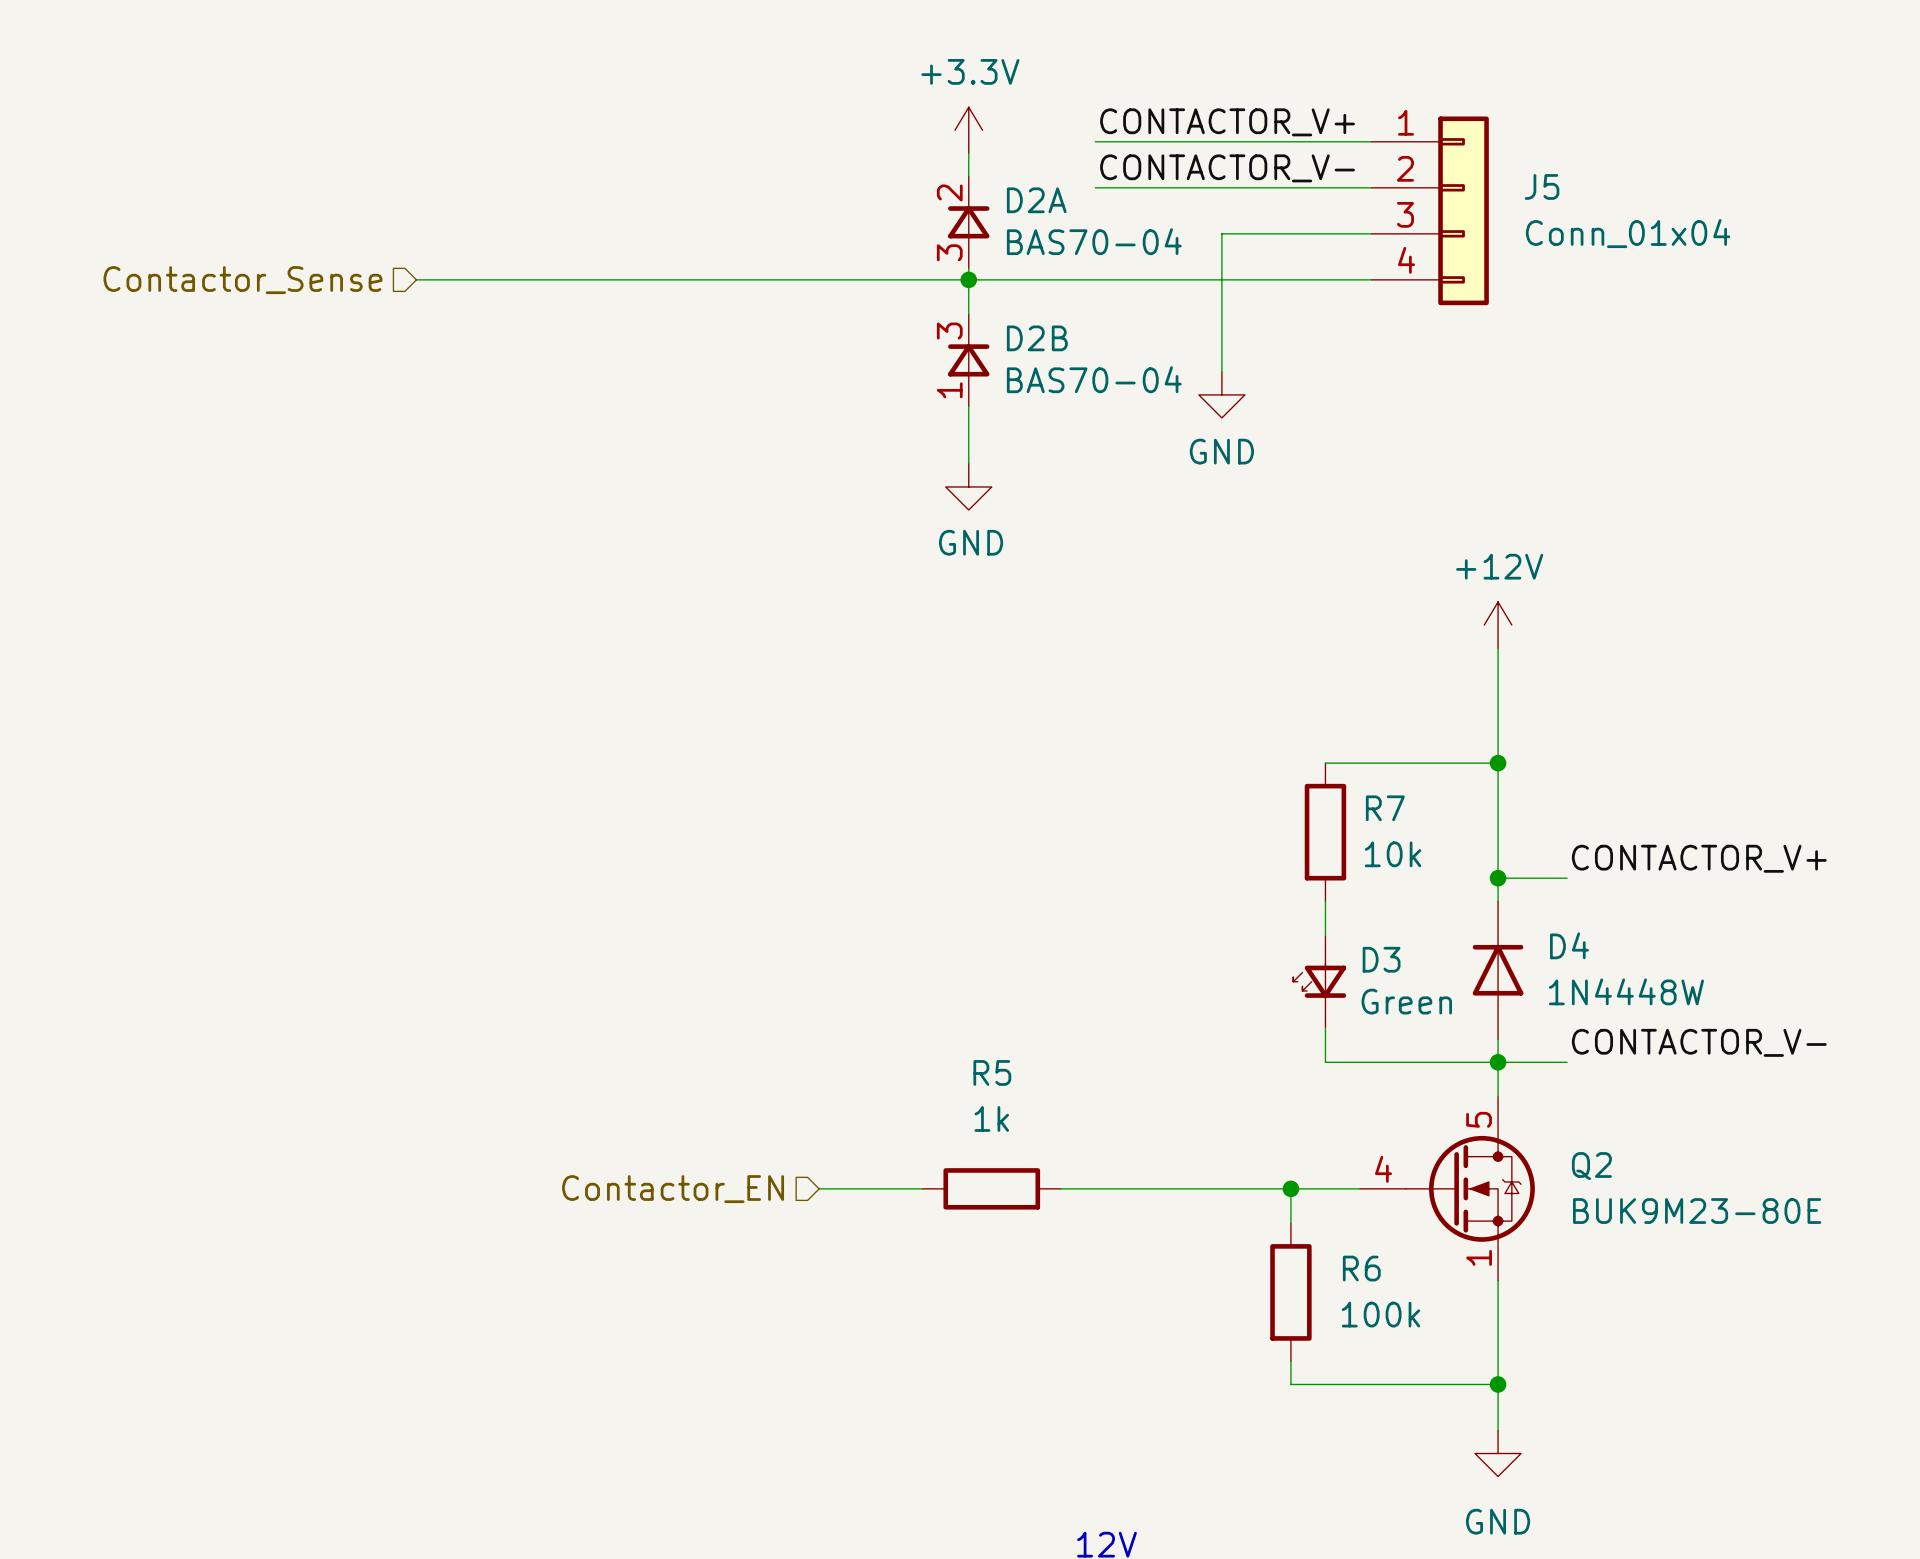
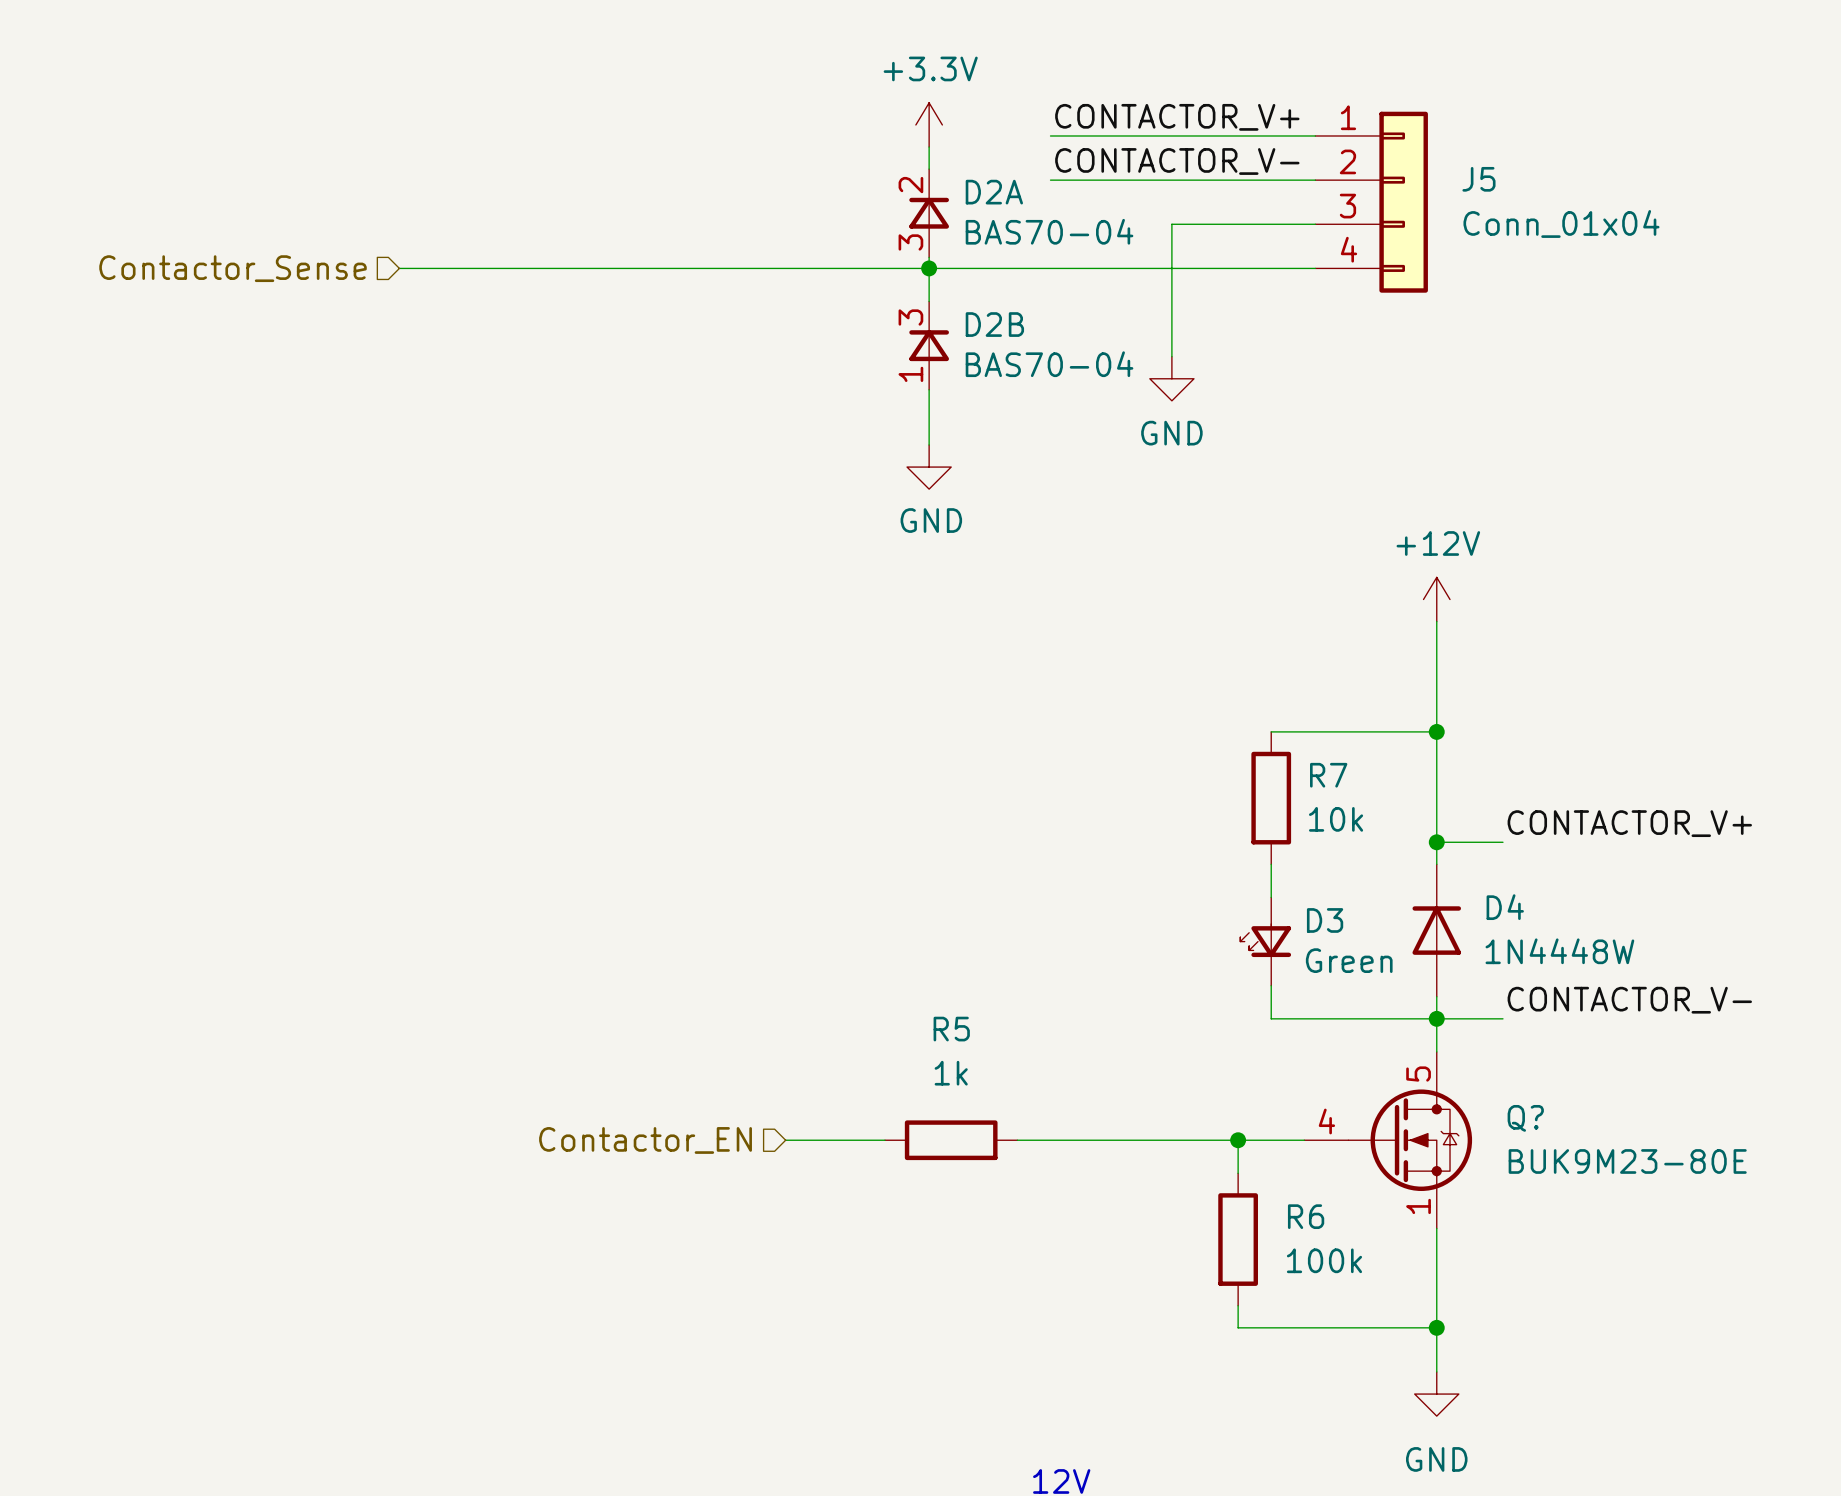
Q2 name: Q2 (1591, 1166) -> Q? (1525, 1118)

